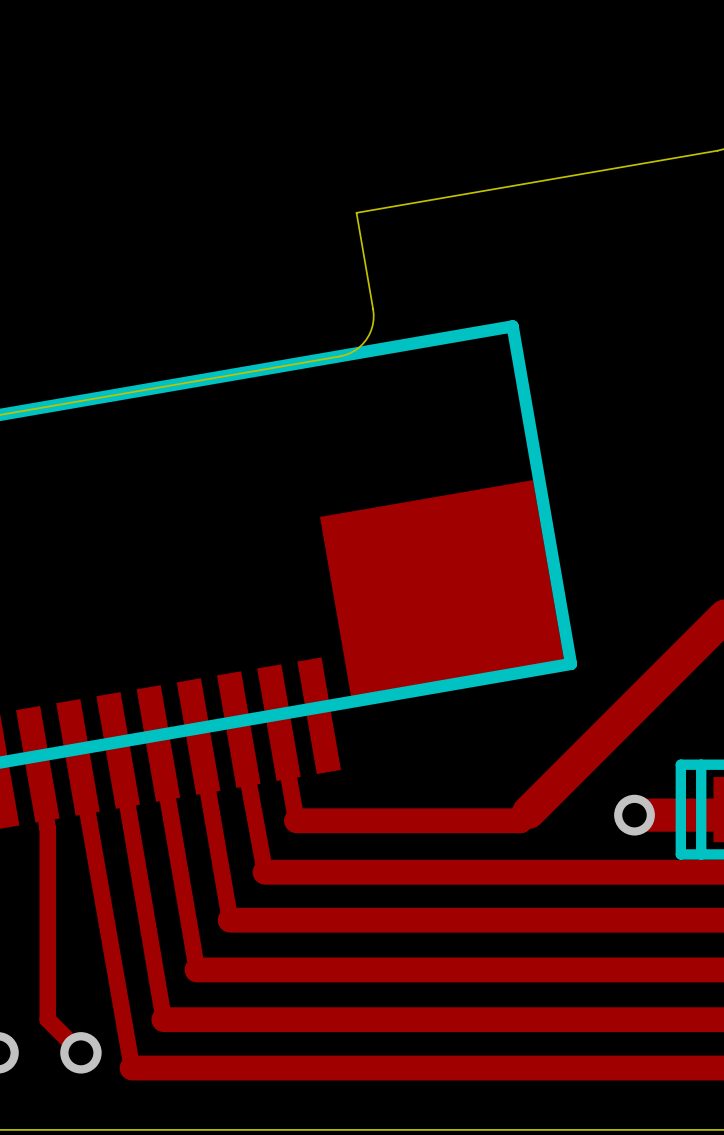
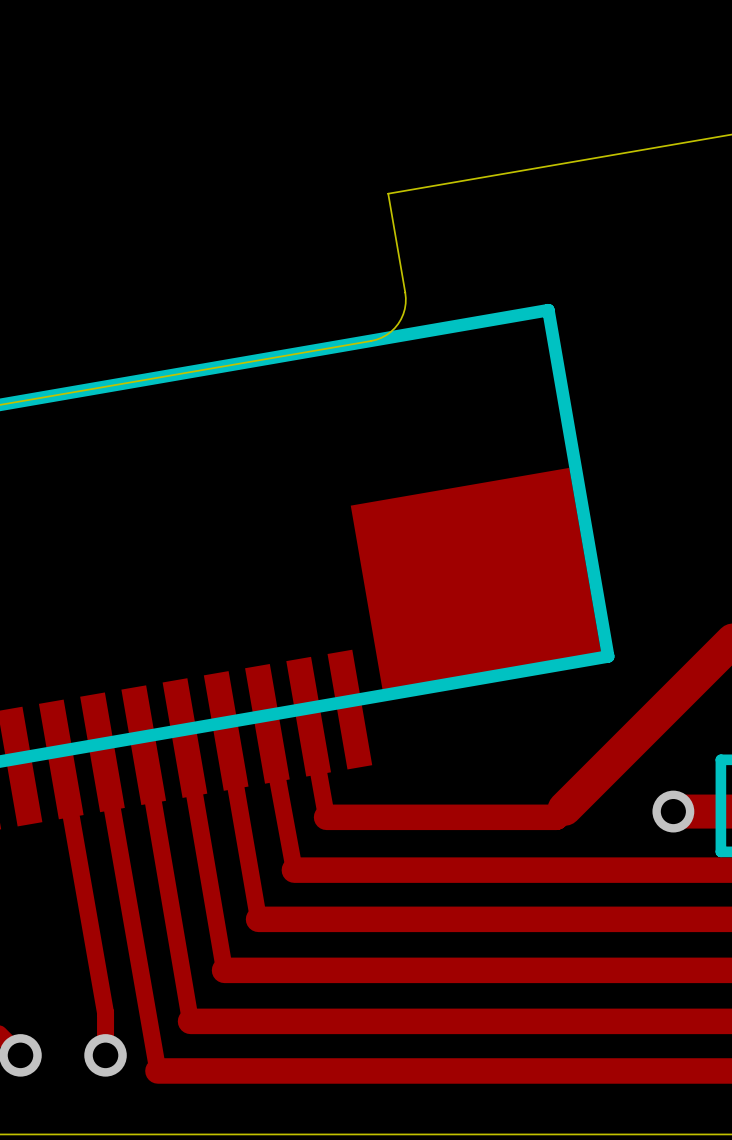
track: (37, 764) (47, 829) (47, 1019) (80, 1052) -> (61, 759) (105, 1012) (105, 1055)

